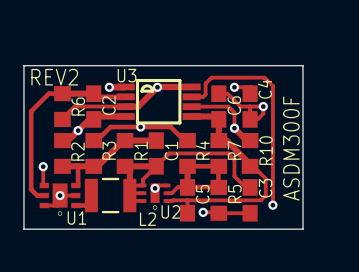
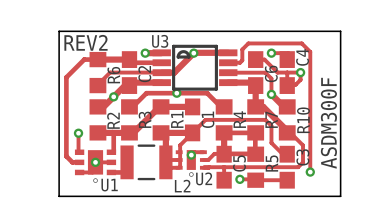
track: (143, 178) (143, 185) (129, 185) -> (180, 145) (180, 167)

